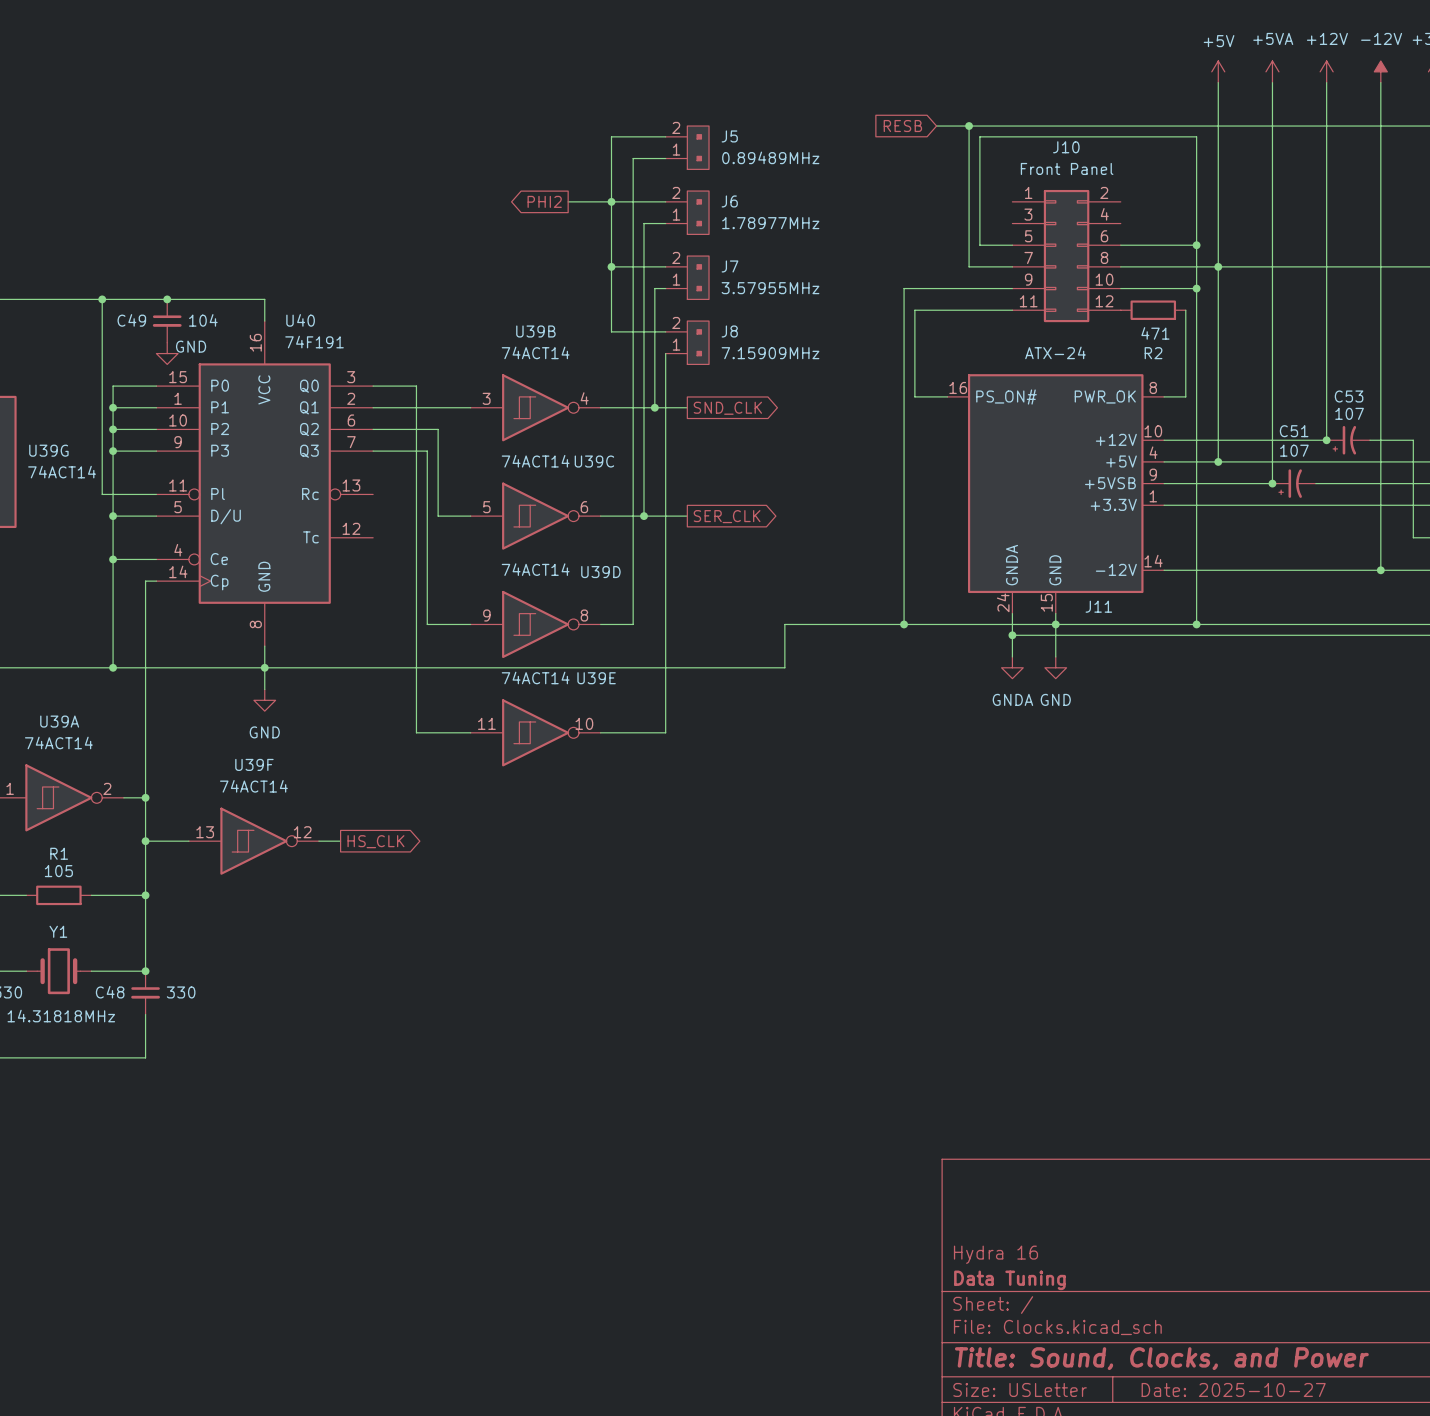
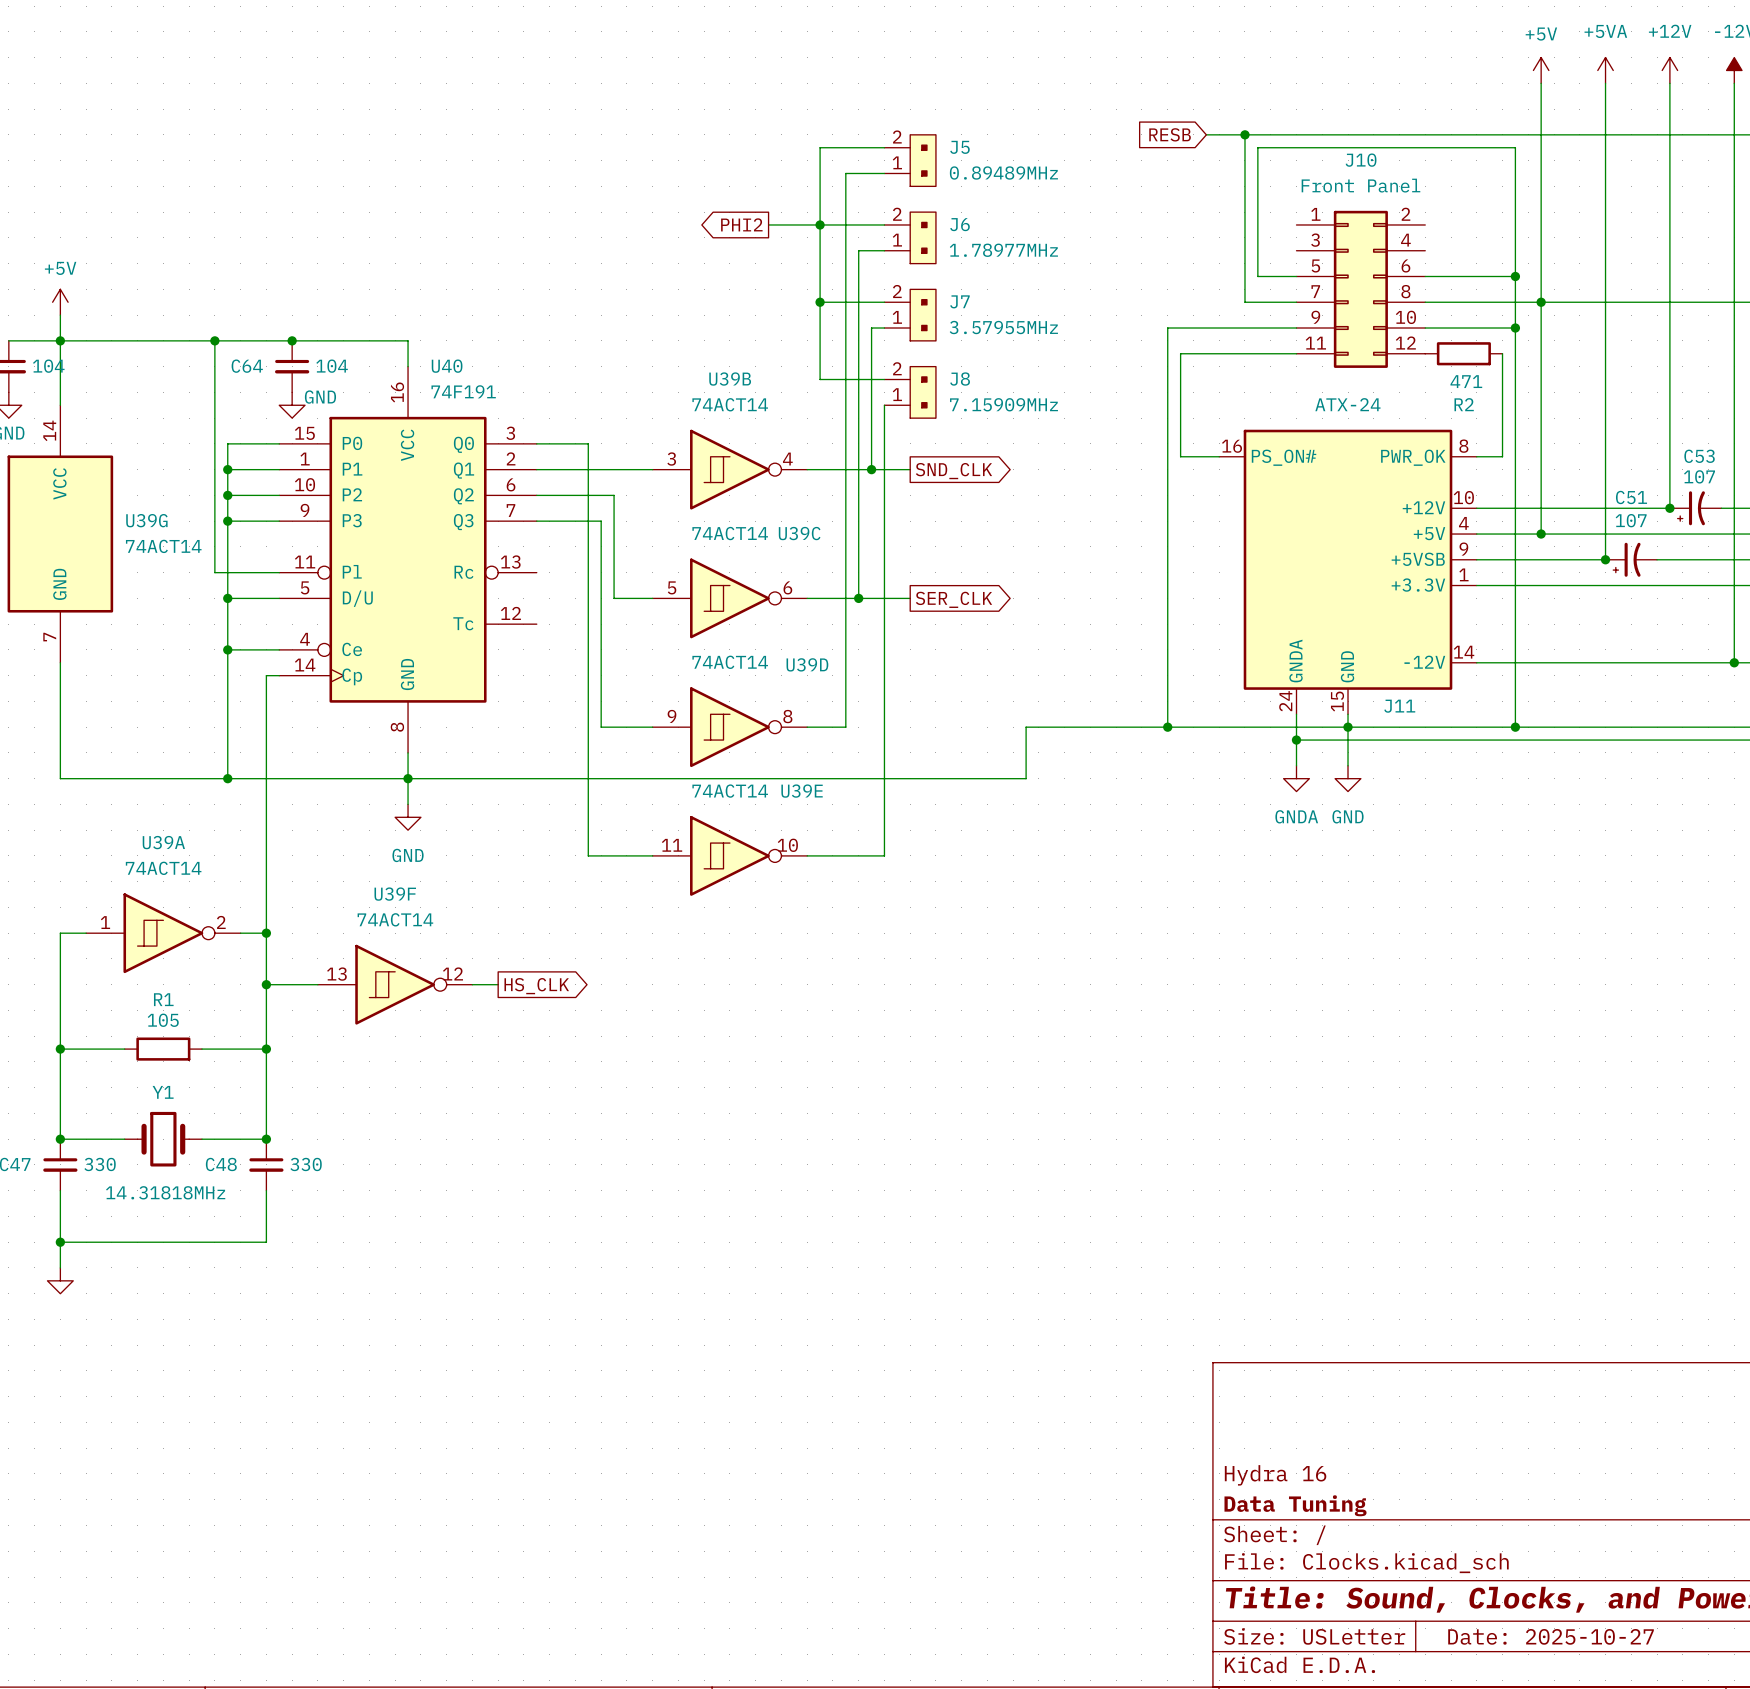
C49 name: C49 (131, 320) -> C64 (247, 366)

